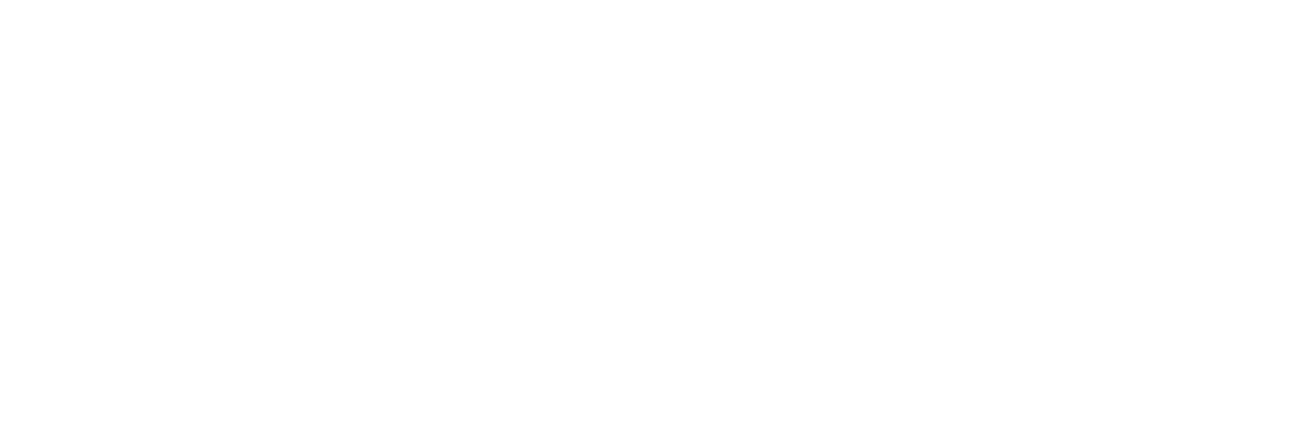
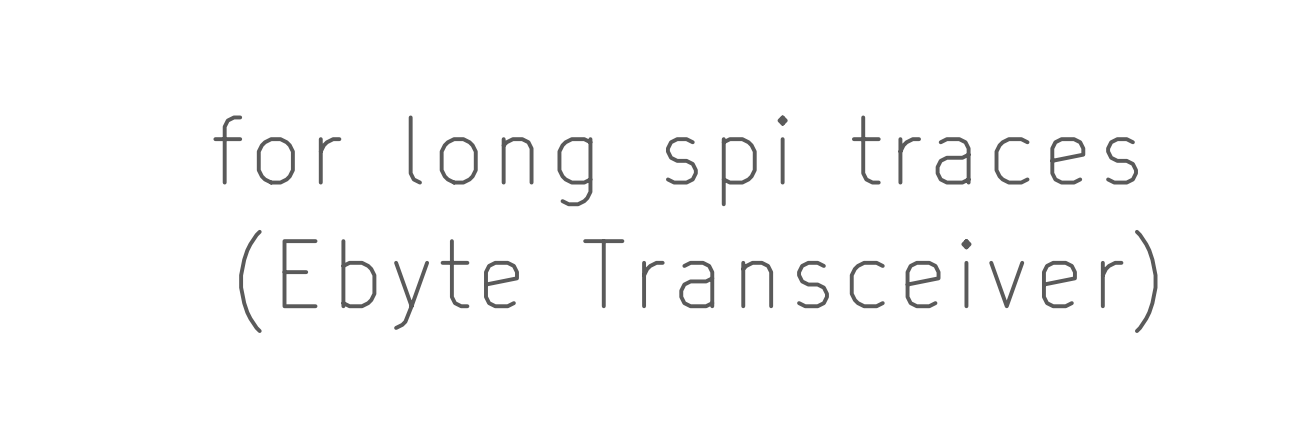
text: none -> for long spi traces (675, 160)
text: none -> (Ebyte Transceiver) (698, 281)

